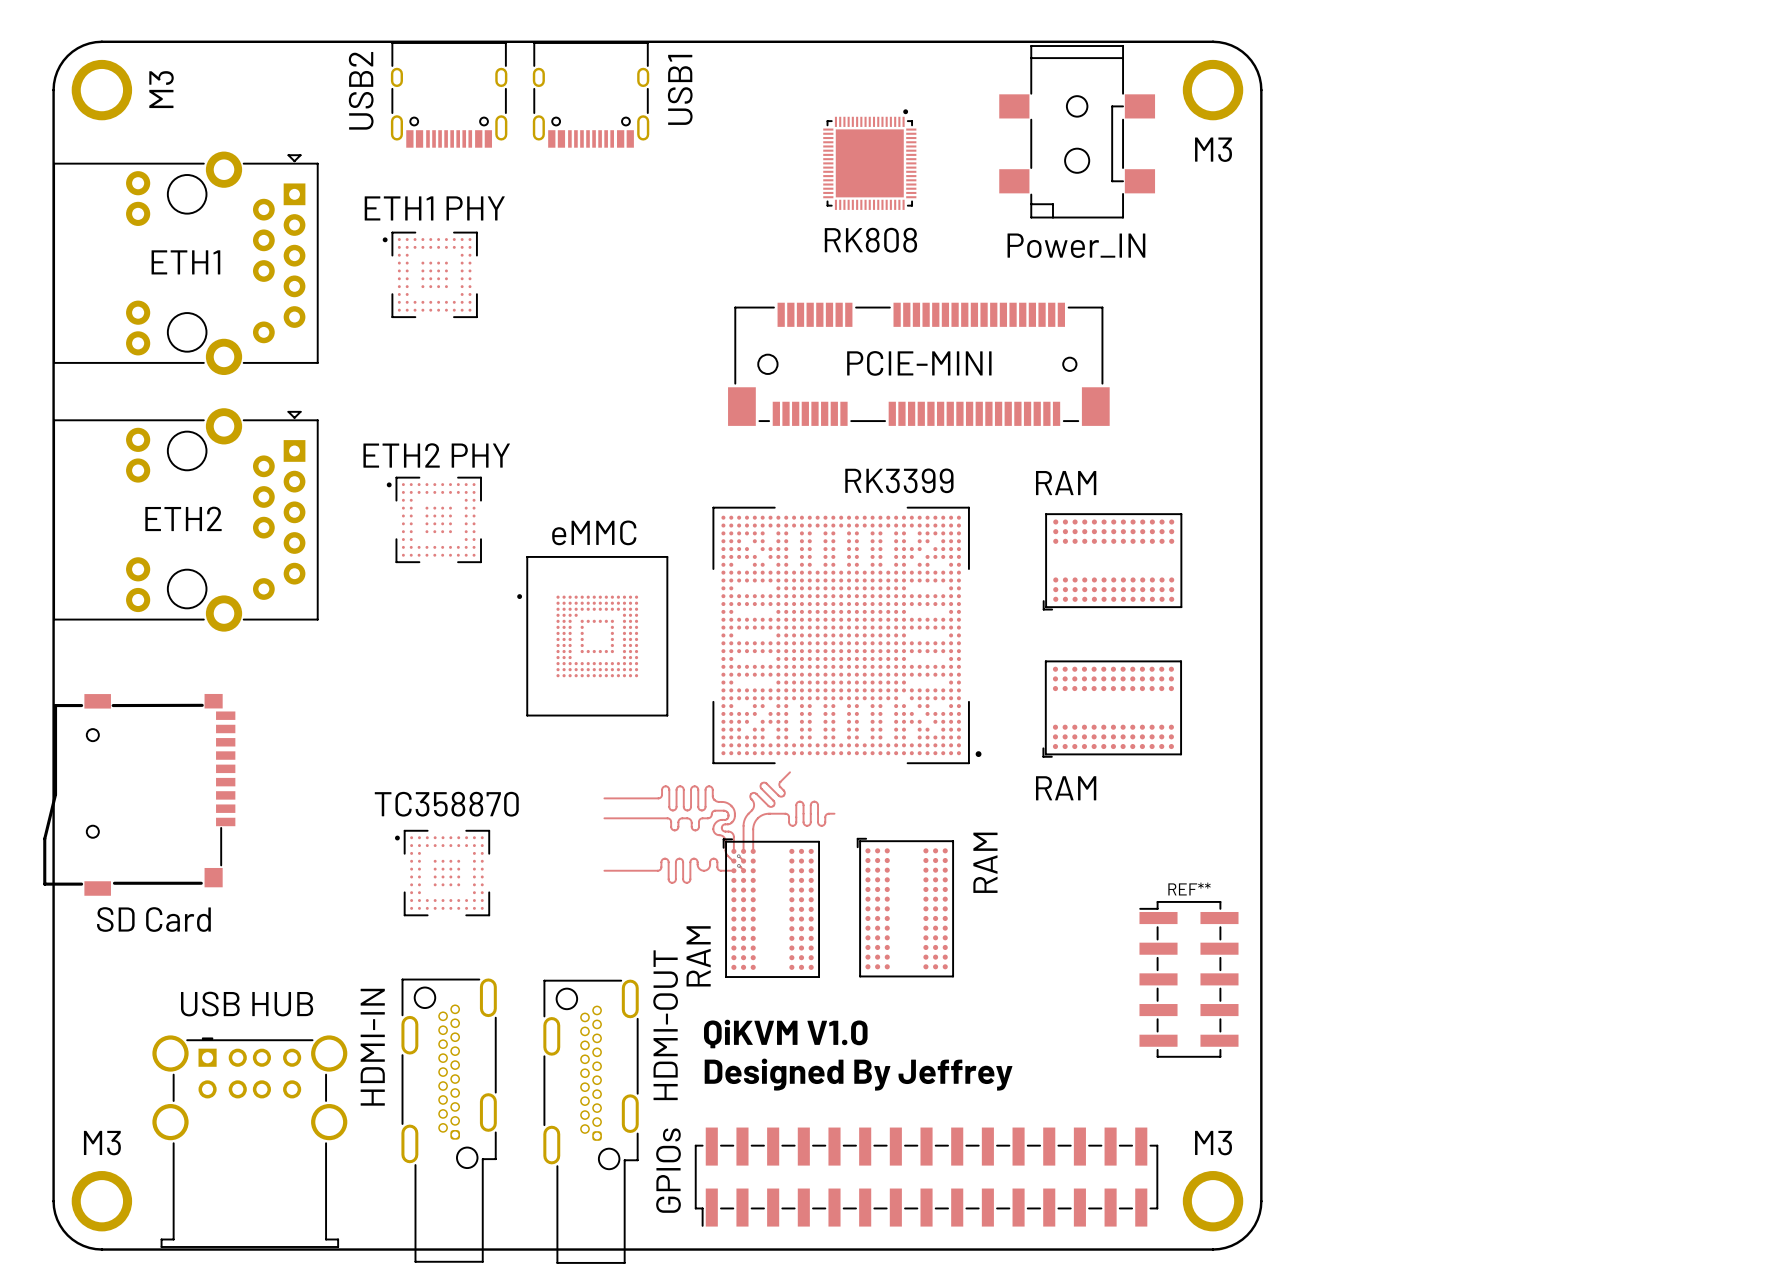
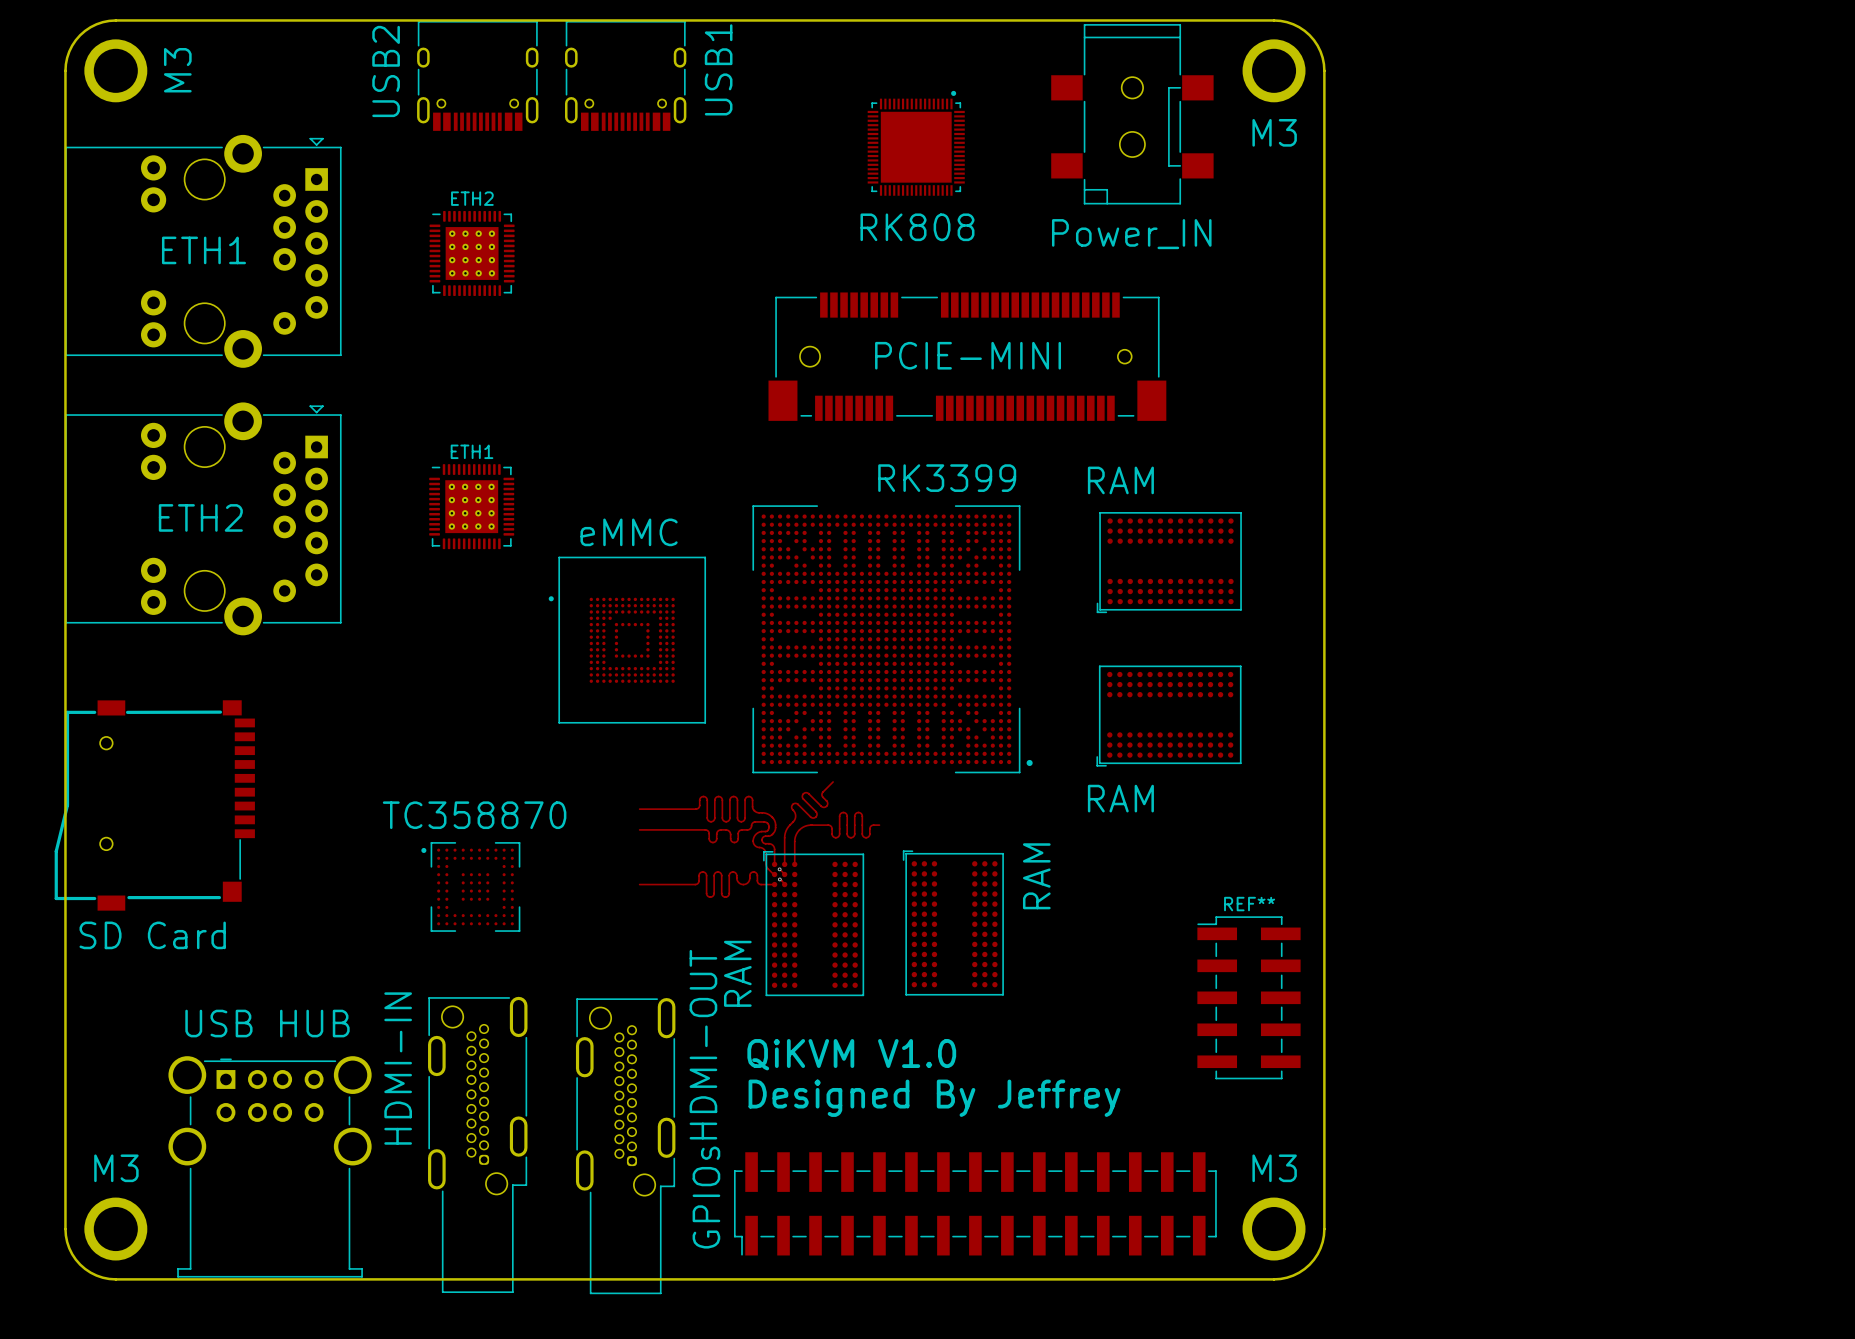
ETH2: none -> (472, 253)
ETH1 PHY: (430, 274) -> none
ETH1: none -> (471, 506)
ETH2 PHY: (434, 519) -> none

